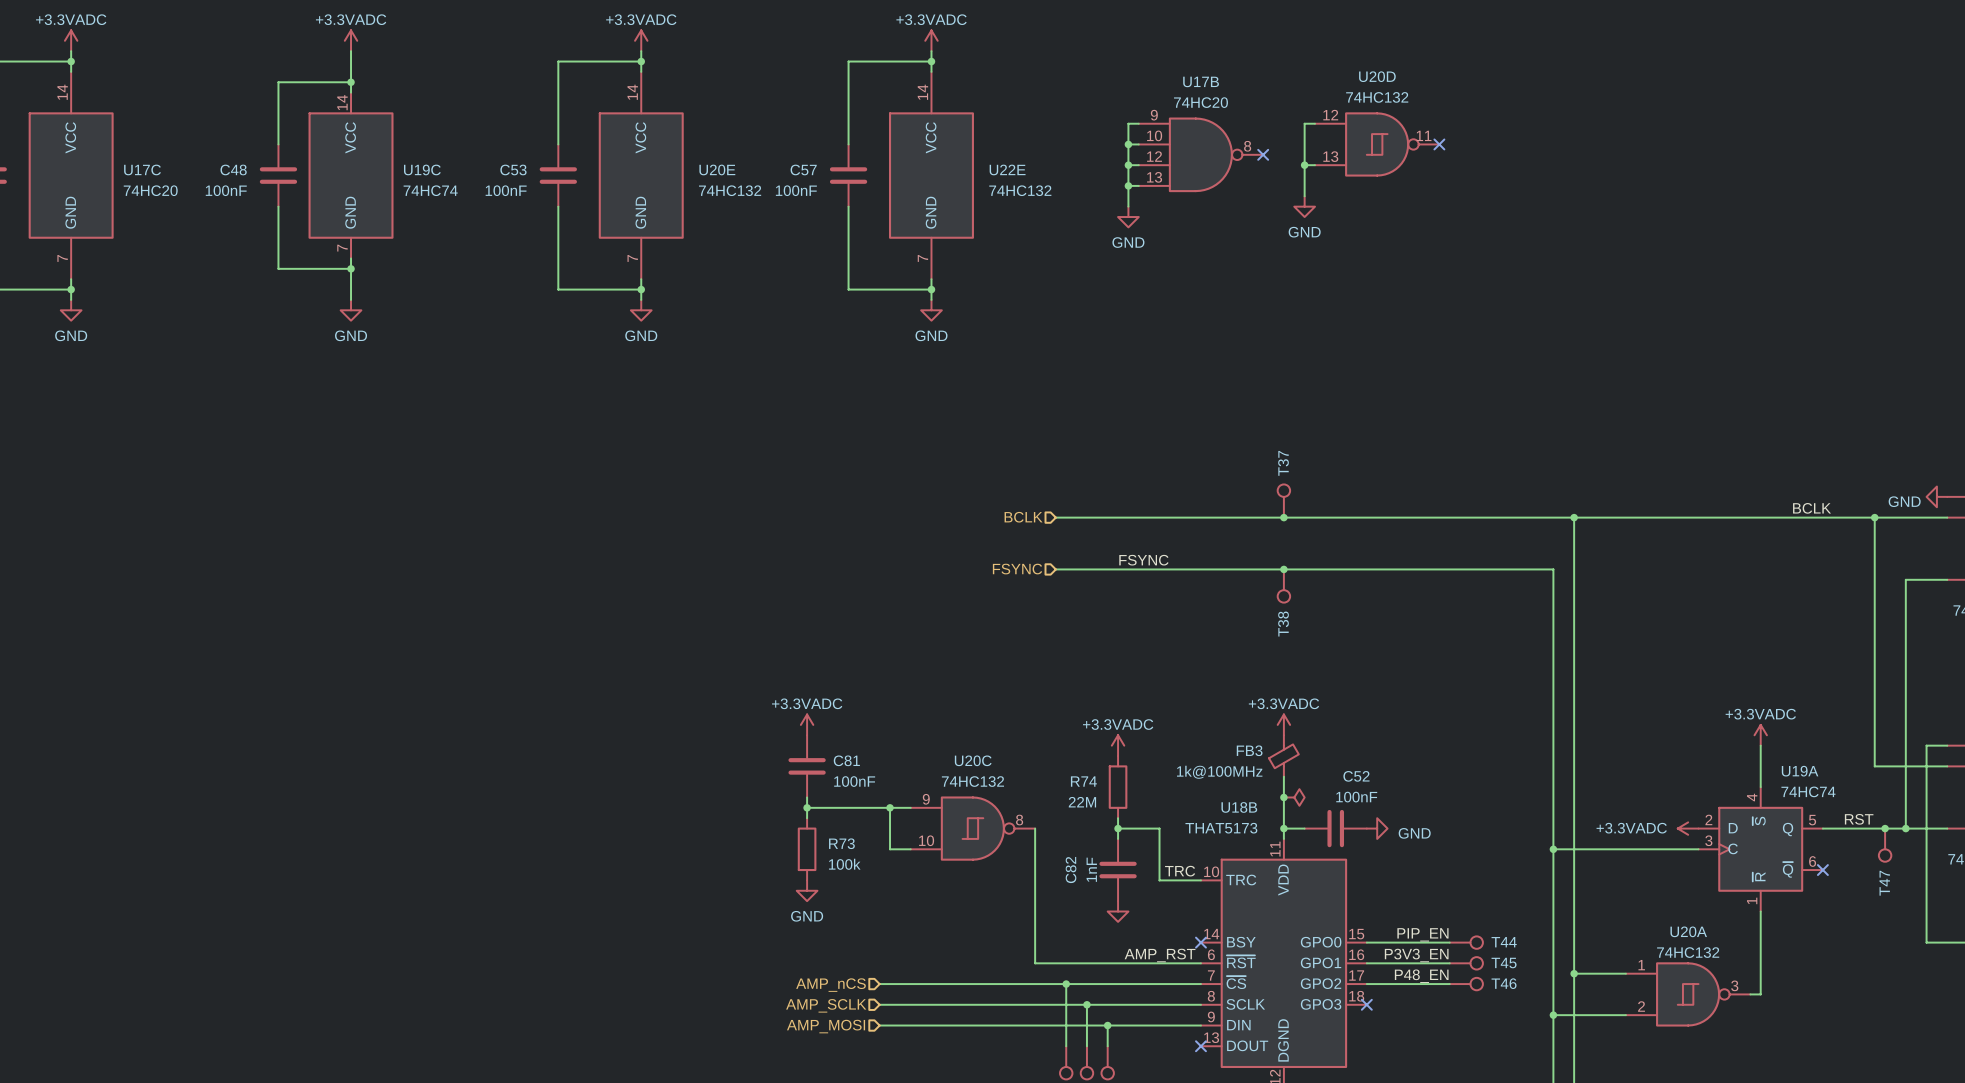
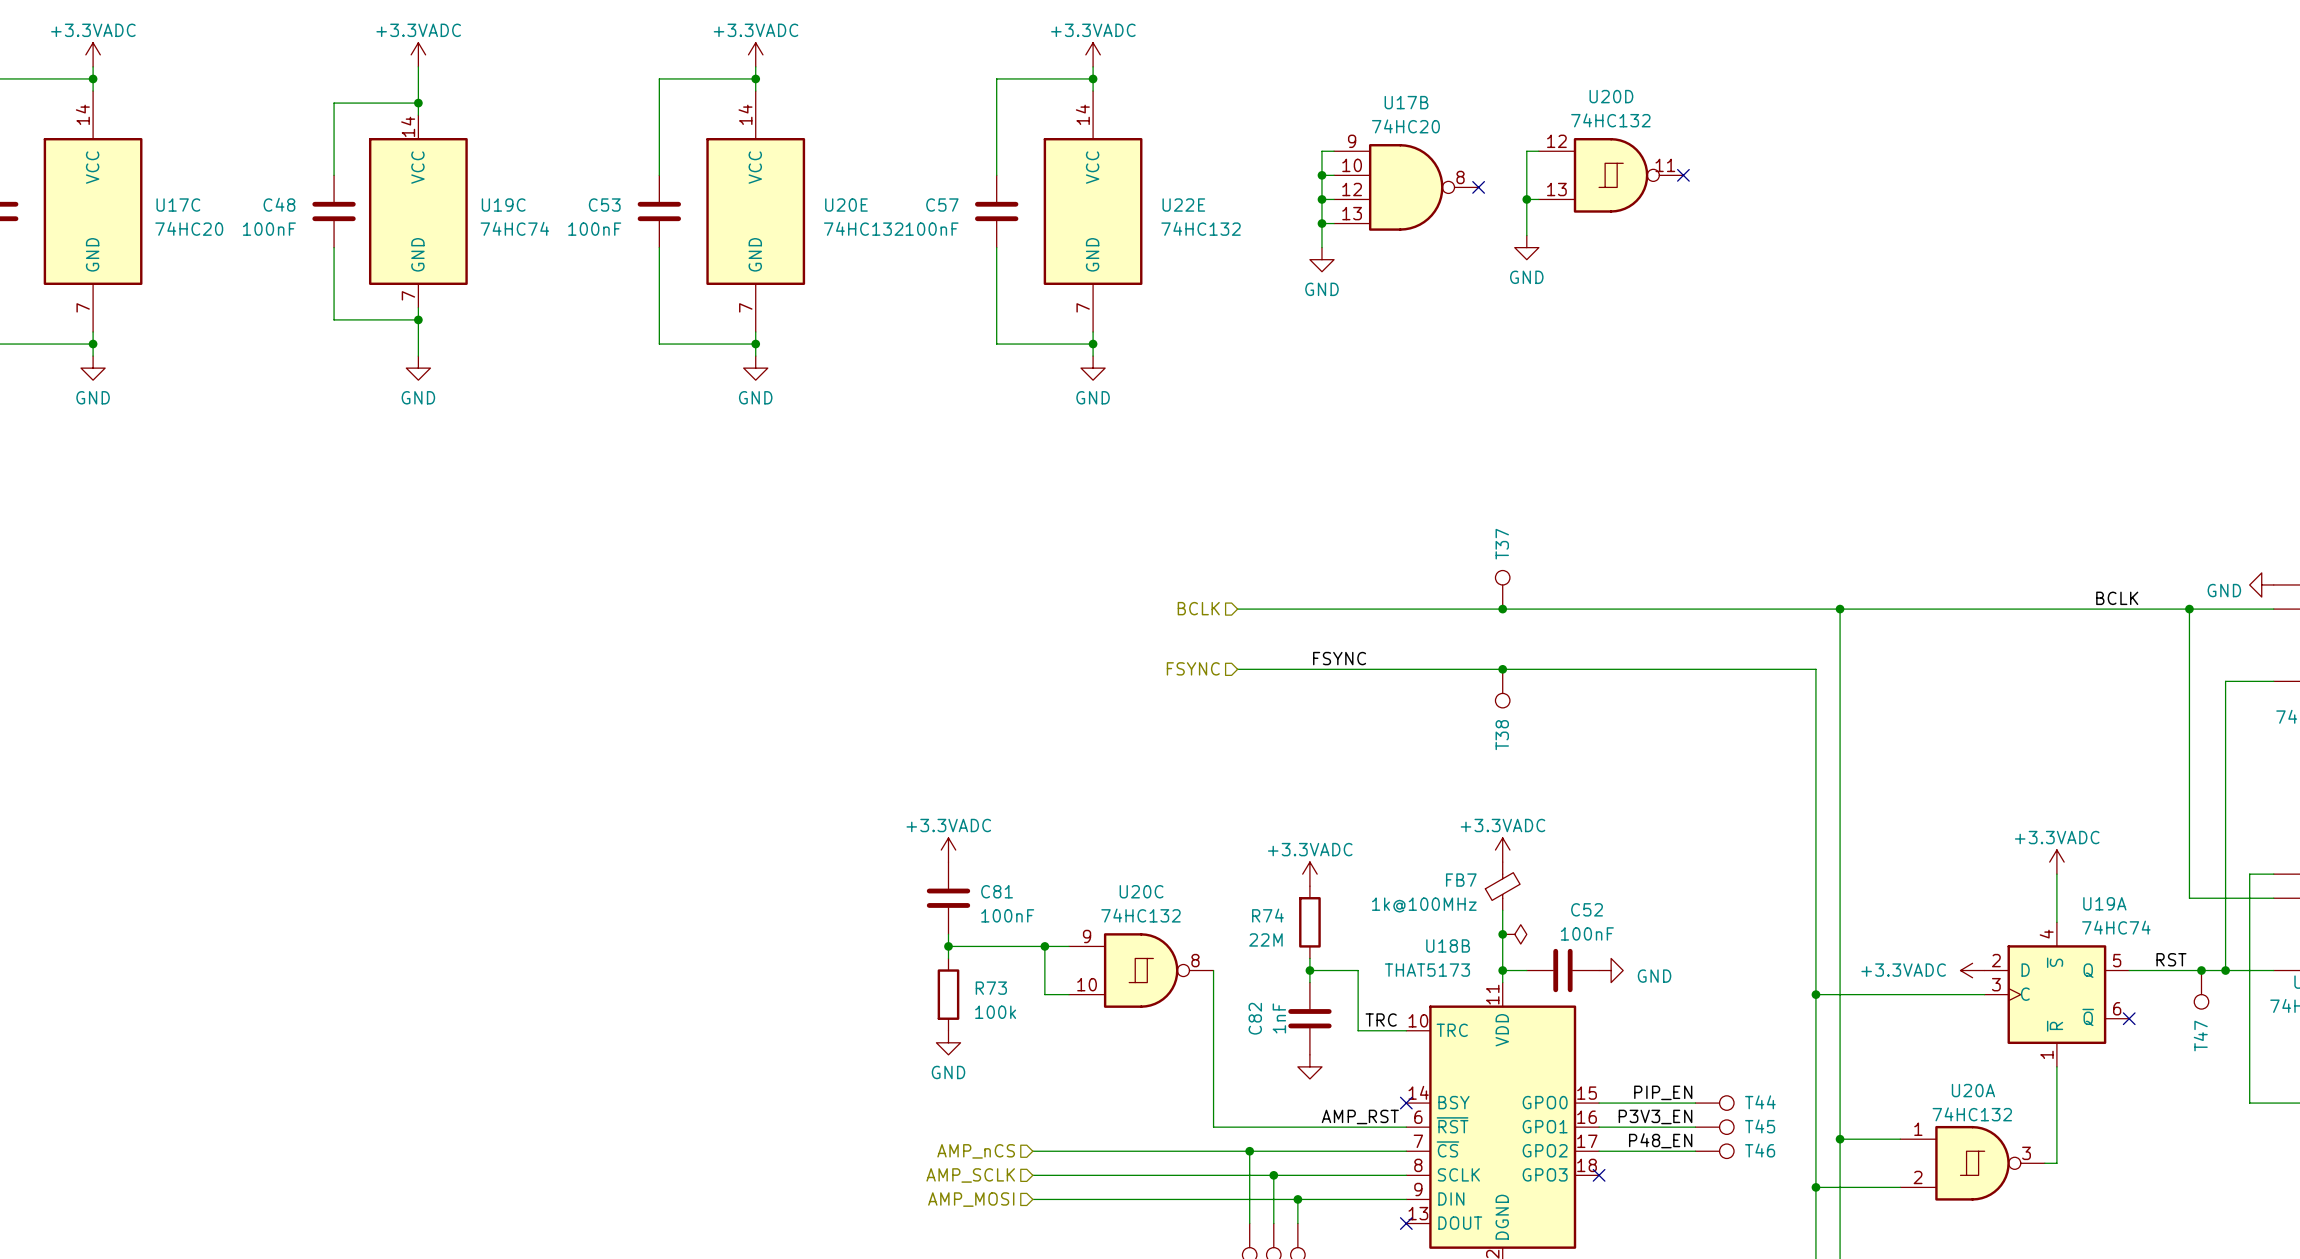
FB3 name: FB3 (1249, 750) -> FB7 (1461, 880)

